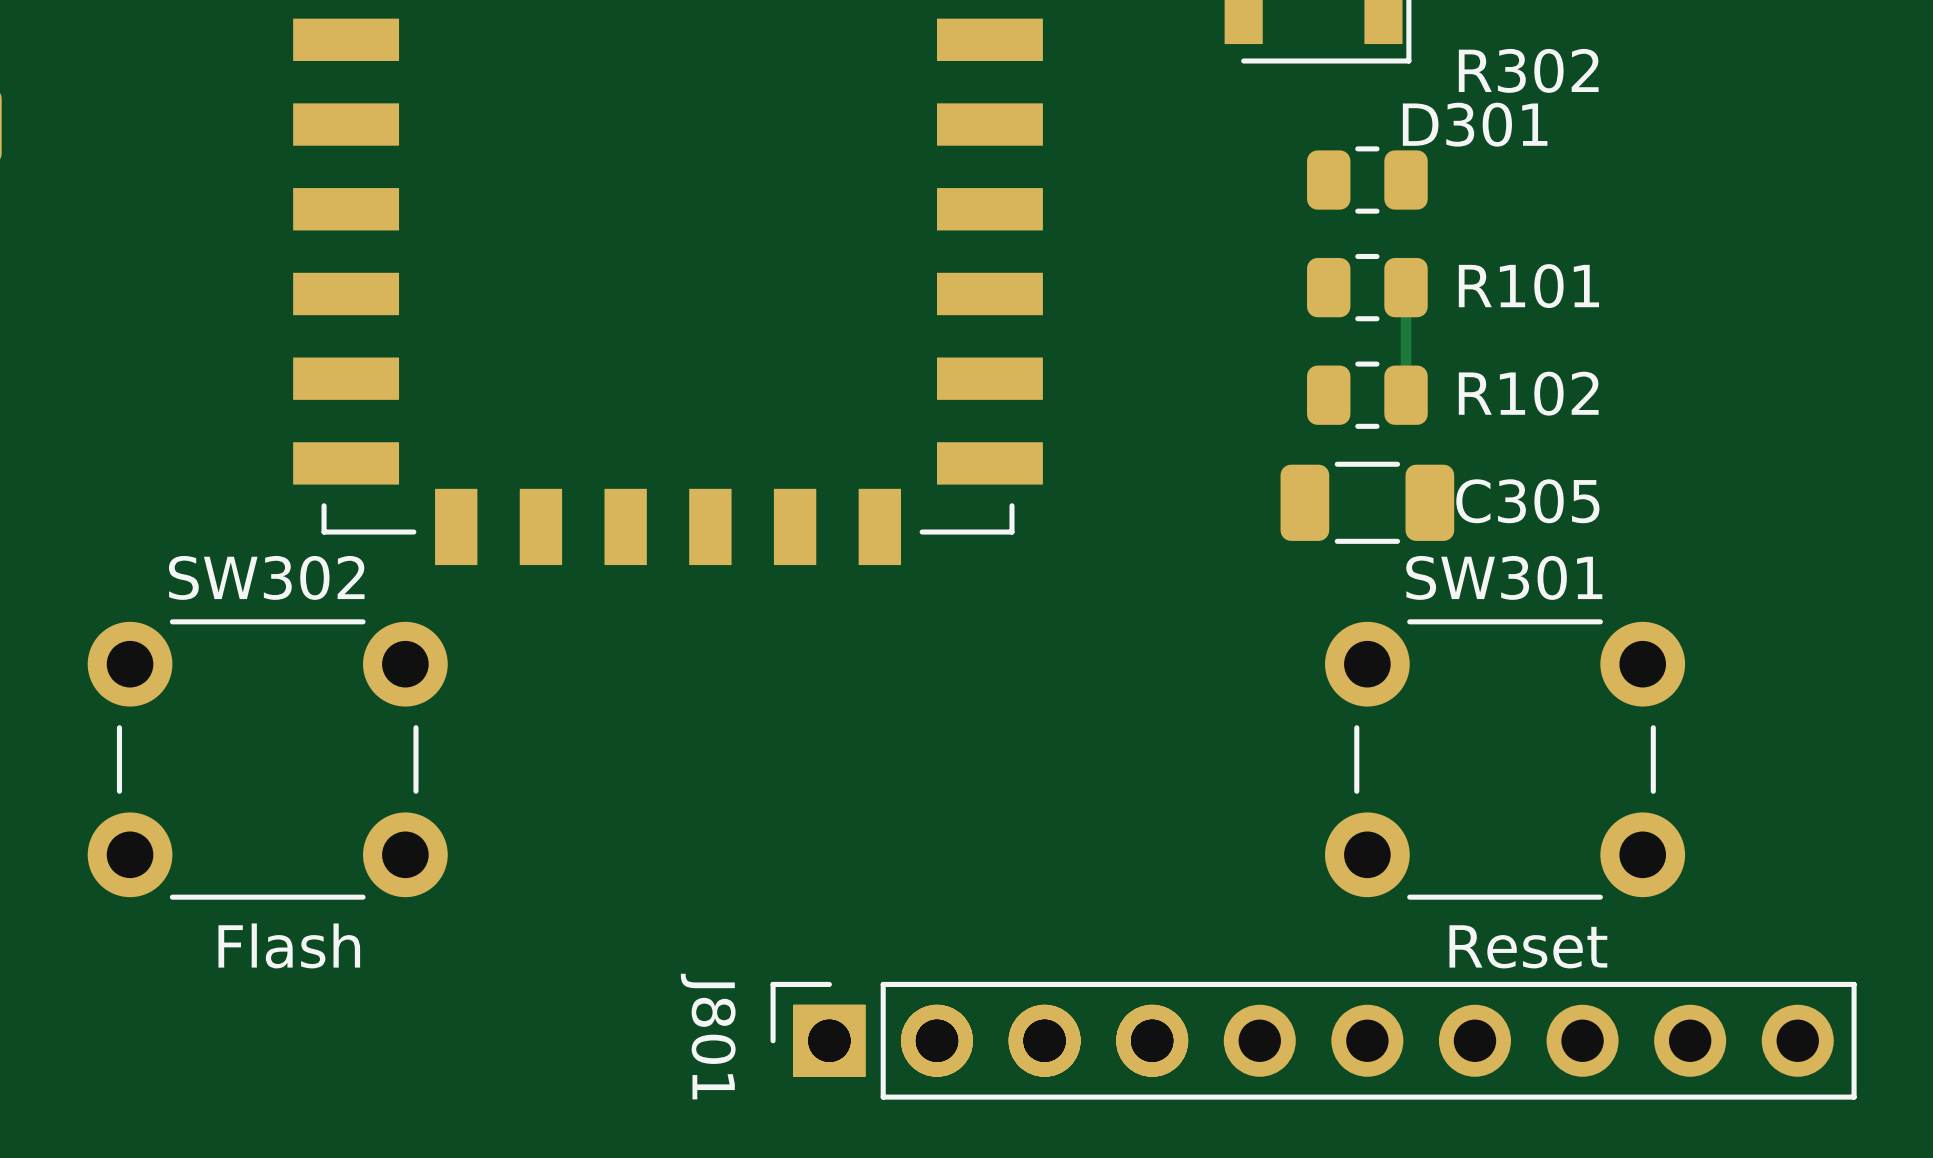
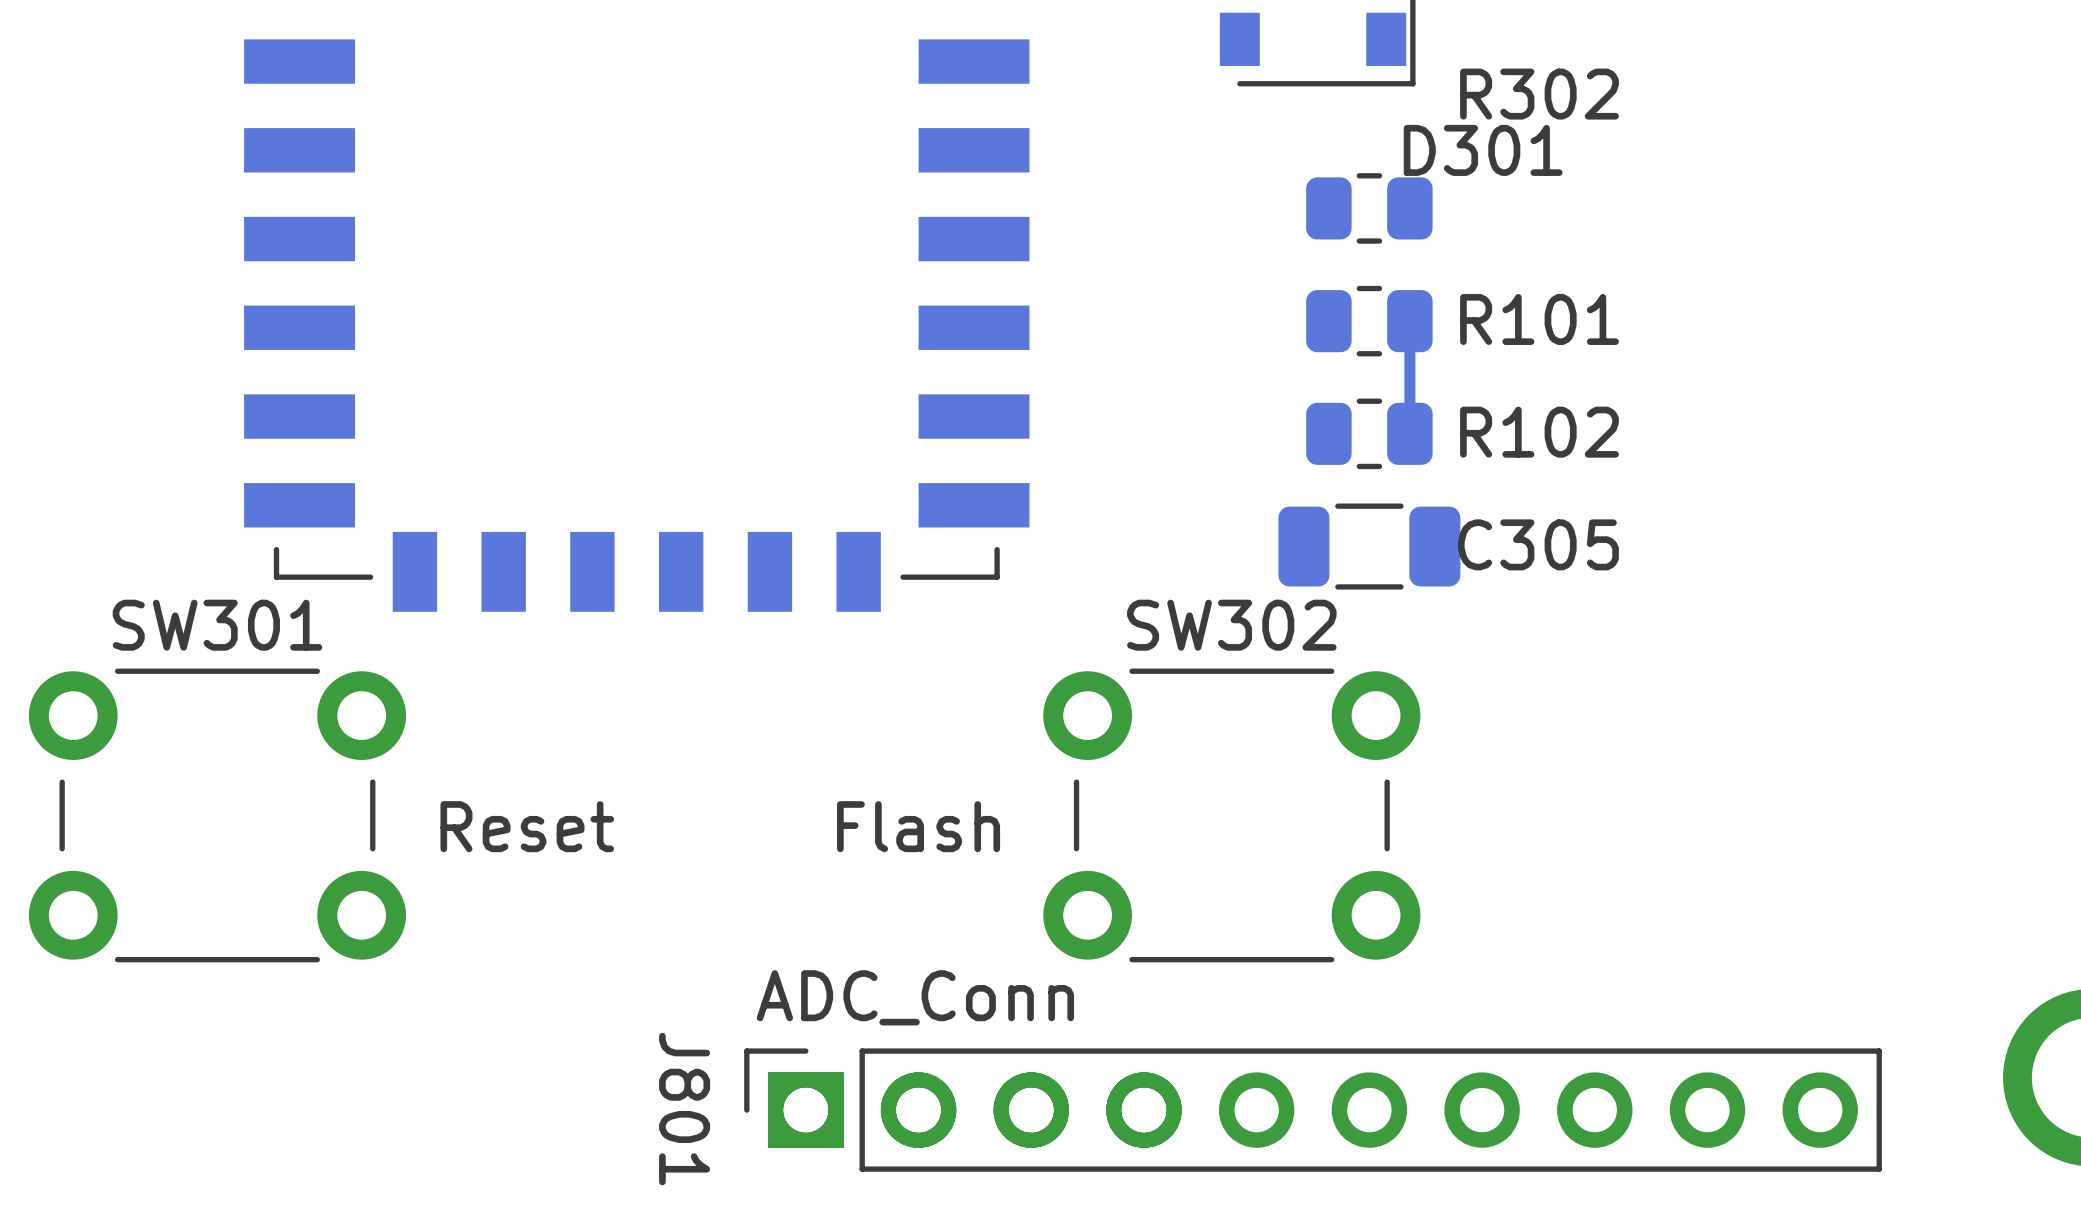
SW302 name: SW302 (266, 577) -> SW301 (217, 625)
SW302: none -> Flash (1231, 815)
SW301: Reset (1505, 759) -> none
J801 value: none -> ADC_Conn (915, 997)
SW302 value: Flash (289, 945) -> Reset (527, 826)

